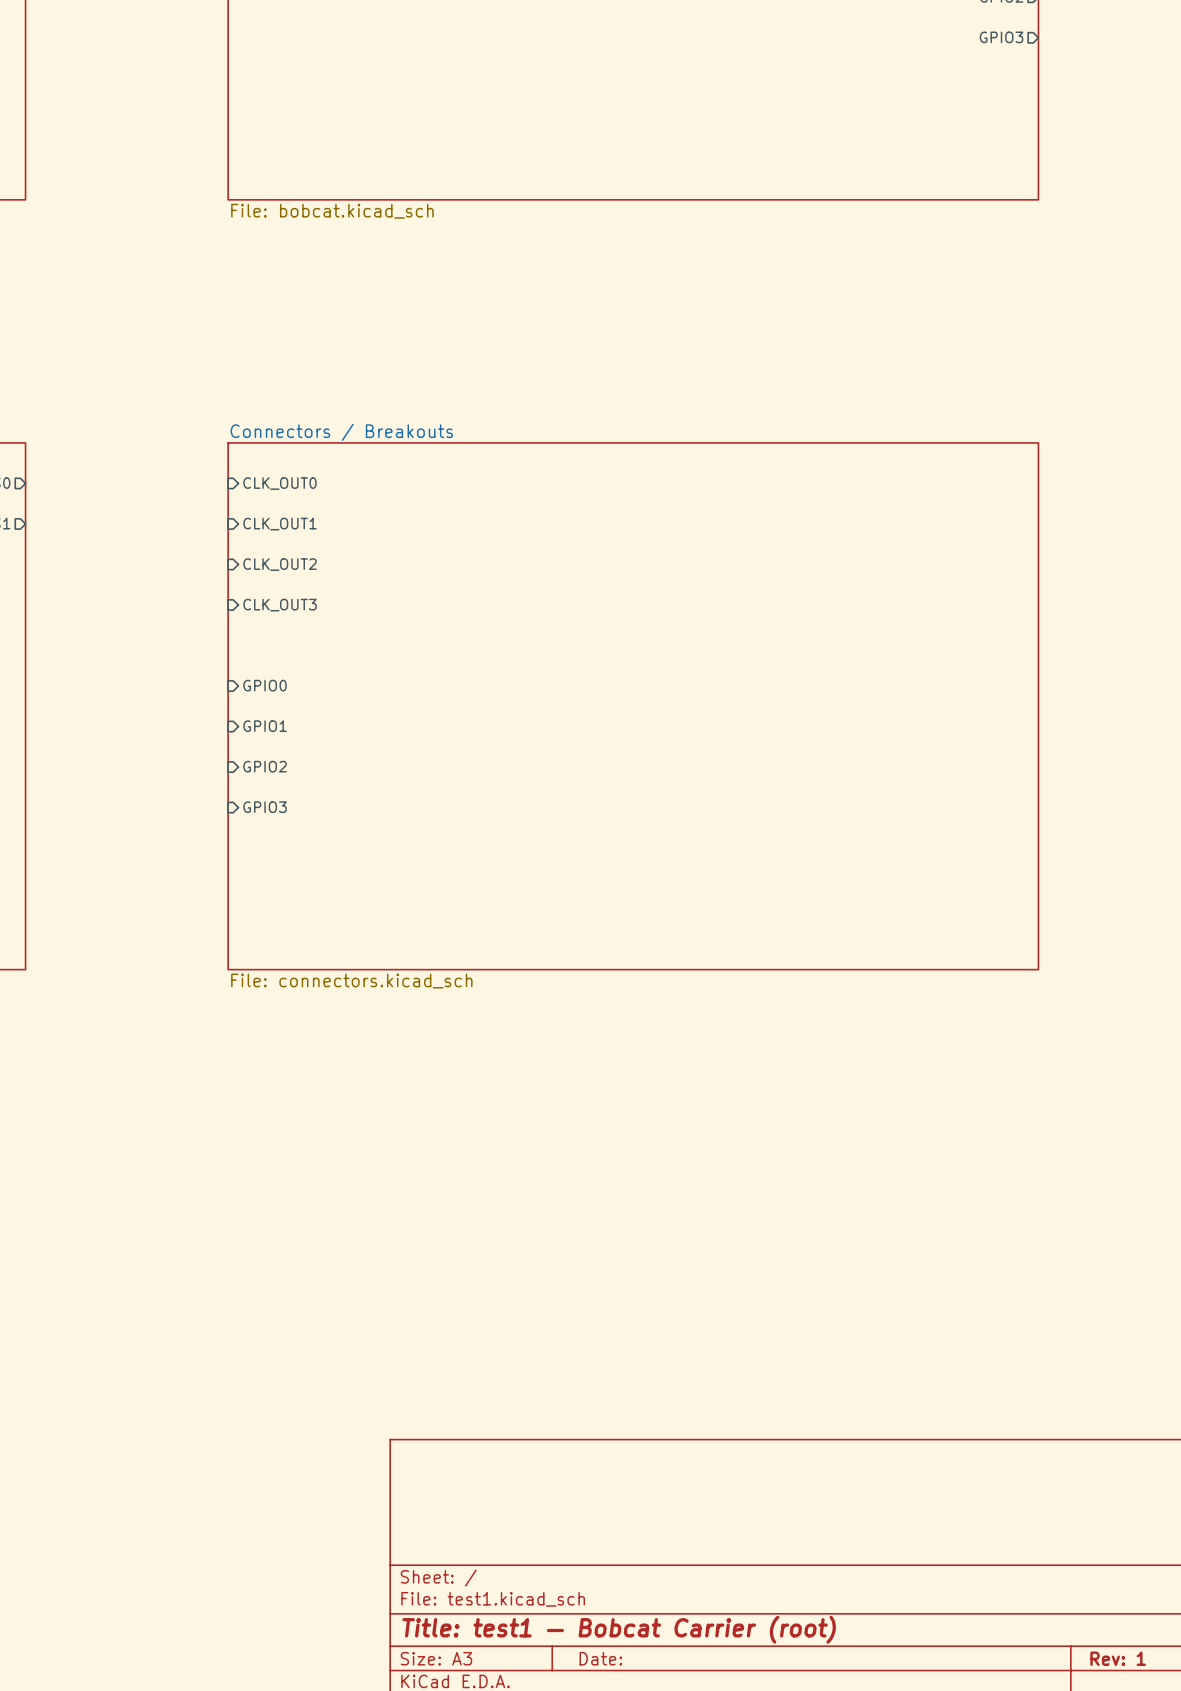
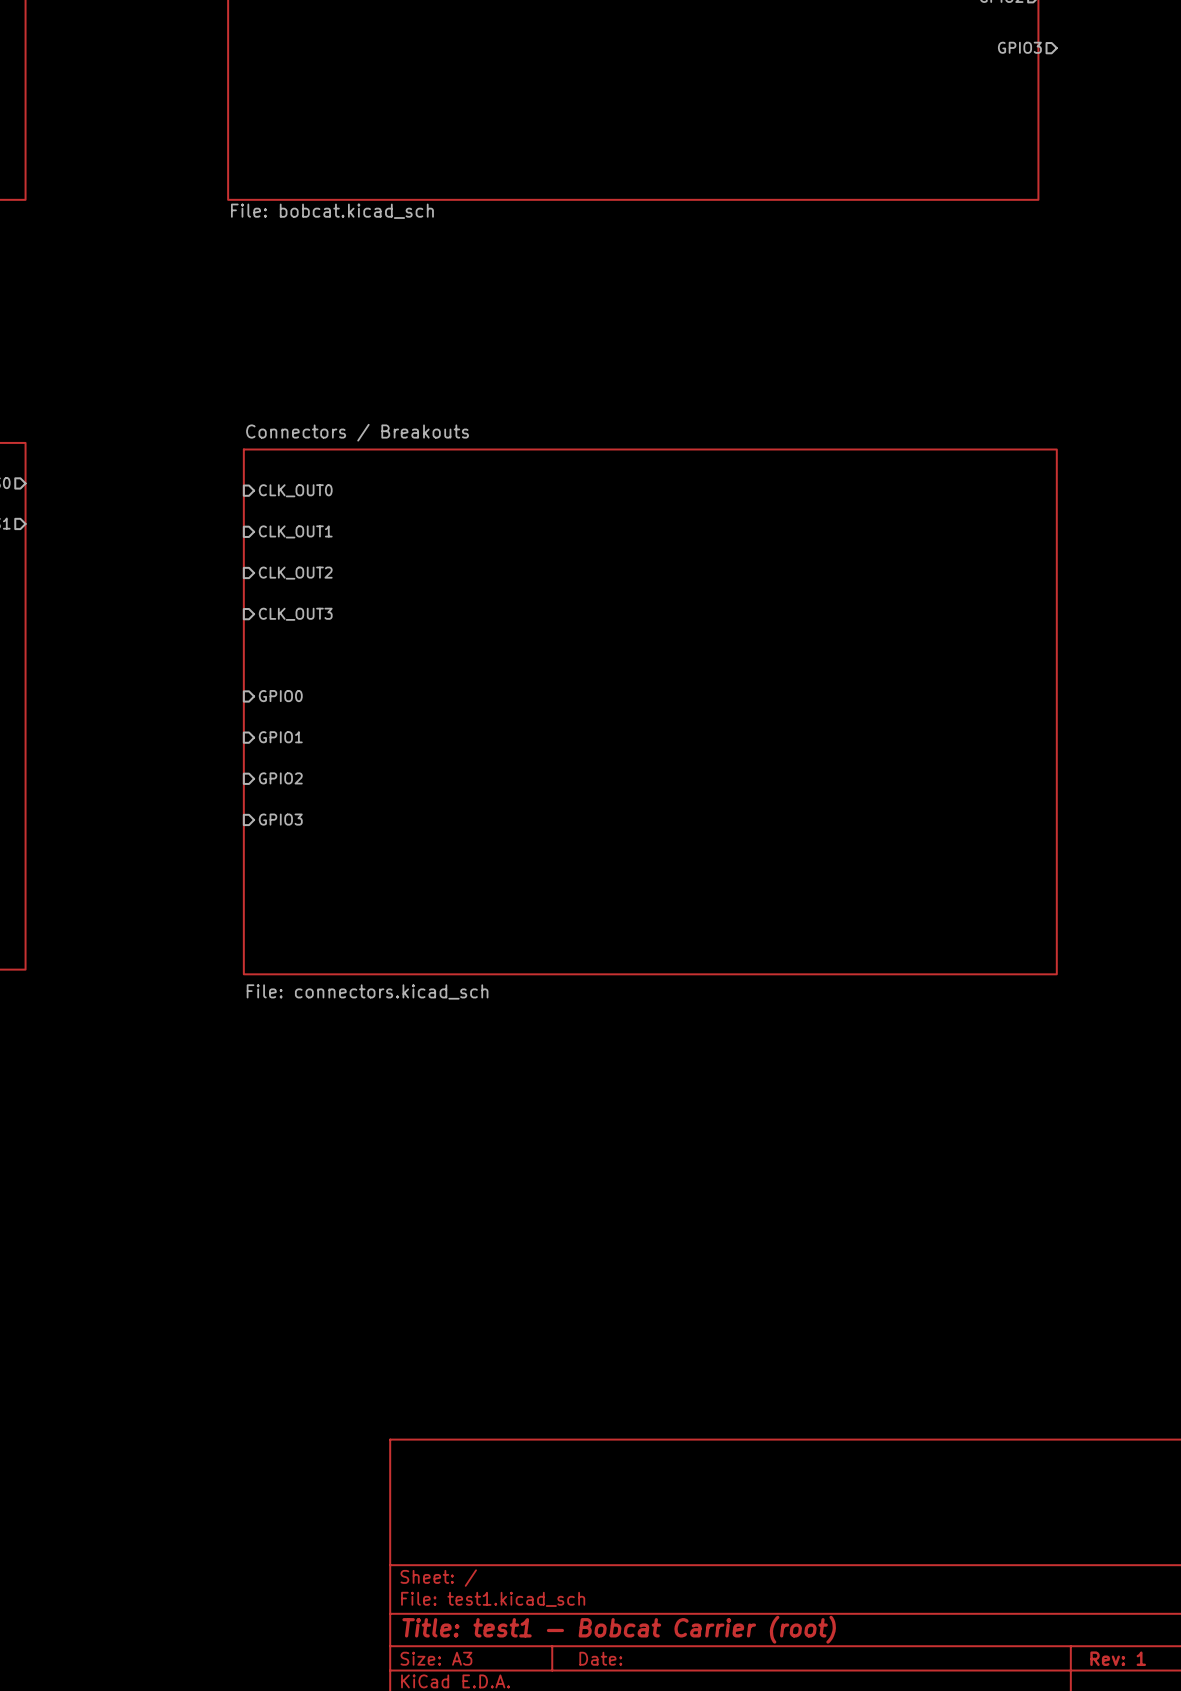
sheet pin position: GPIO3 (1001, 37) -> GPIO3 (1019, 47)
sheet pin position: CLK_OUT0 (279, 483) -> CLK_OUT0 (295, 490)
sheet pin position: CLK_OUT1 (279, 524) -> CLK_OUT1 (295, 531)
sheet pin position: CLK_OUT2 (279, 564) -> CLK_OUT2 (295, 573)
sheet pin position: CLK_OUT3 (279, 605) -> CLK_OUT3 (295, 614)
sheet pin position: GPIO0 (265, 685) -> GPIO0 (280, 696)
sheet Connectors / Breakouts: File: connectors.kicad_sch (633, 706) -> none
sheet Connectors / Breakouts: none -> File: connectors.kicad_sch (650, 711)
sheet pin position: GPIO1 (265, 726) -> GPIO1 (280, 737)
sheet pin position: GPIO2 (265, 766) -> GPIO2 (280, 778)
sheet pin position: GPIO3 (265, 807) -> GPIO3 (280, 819)

